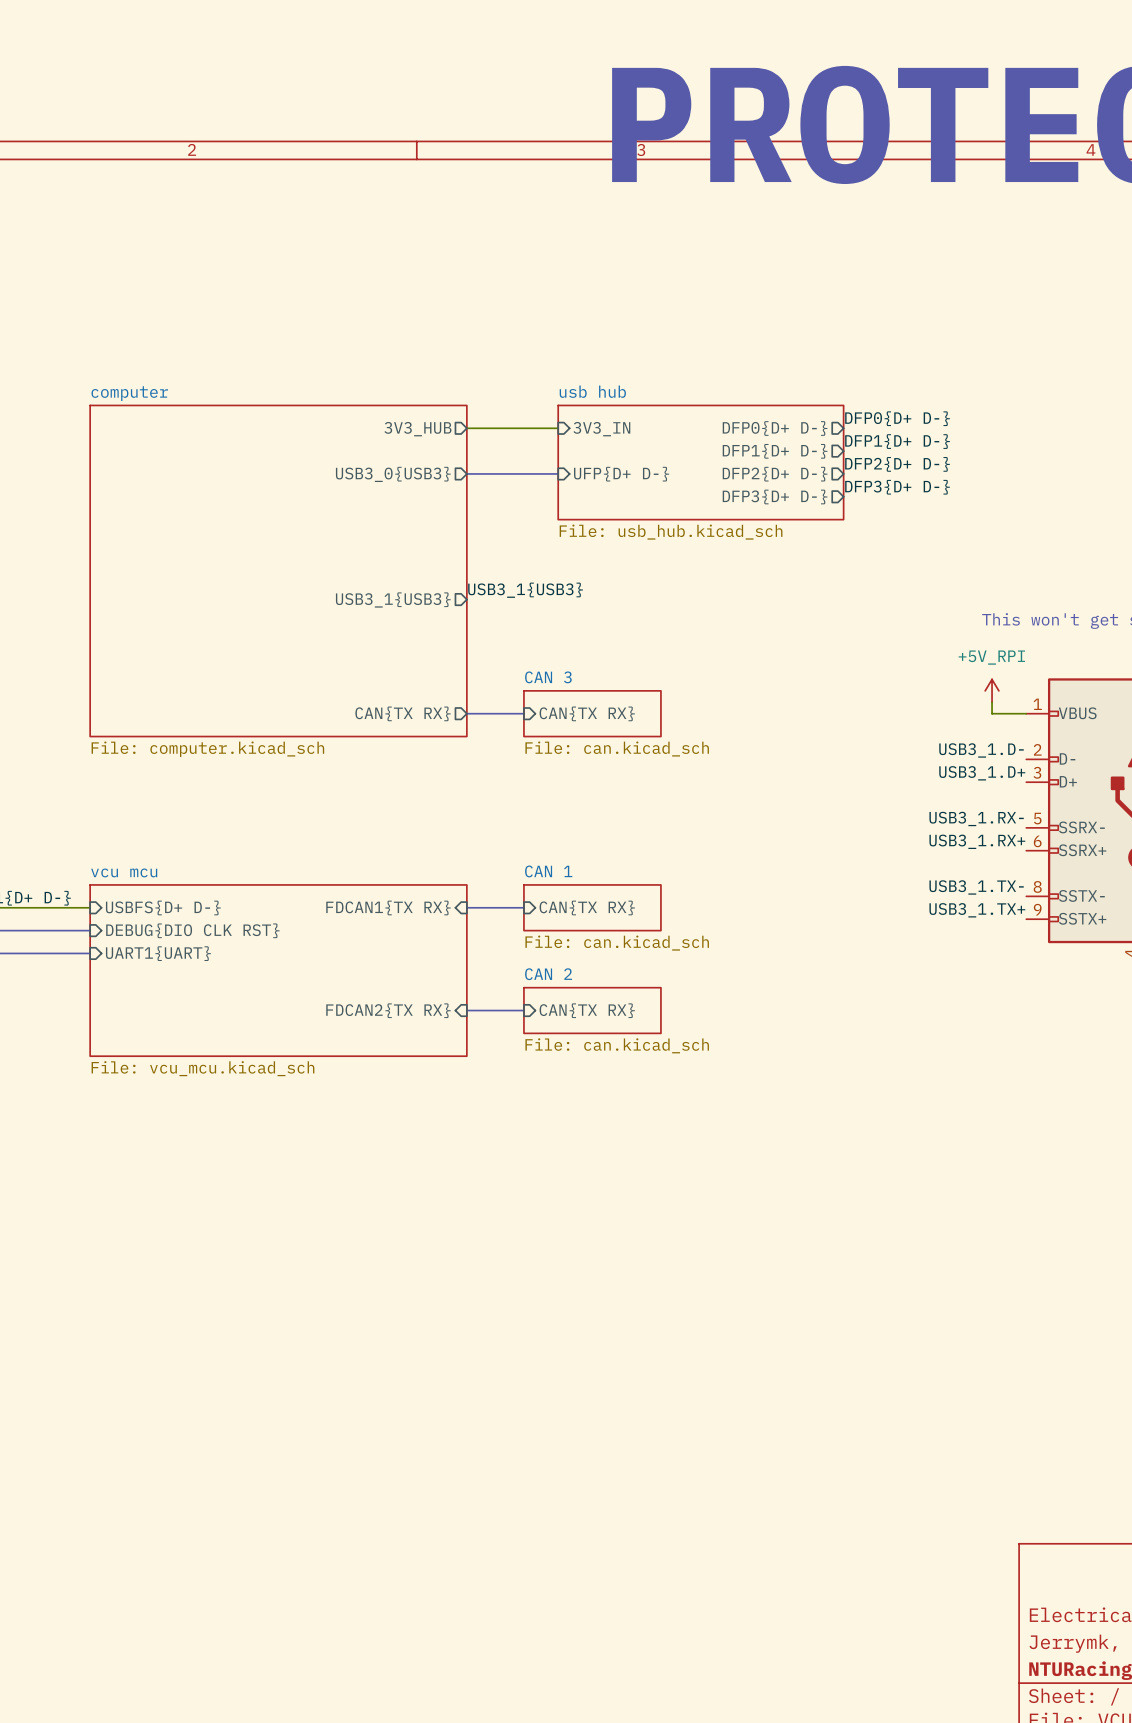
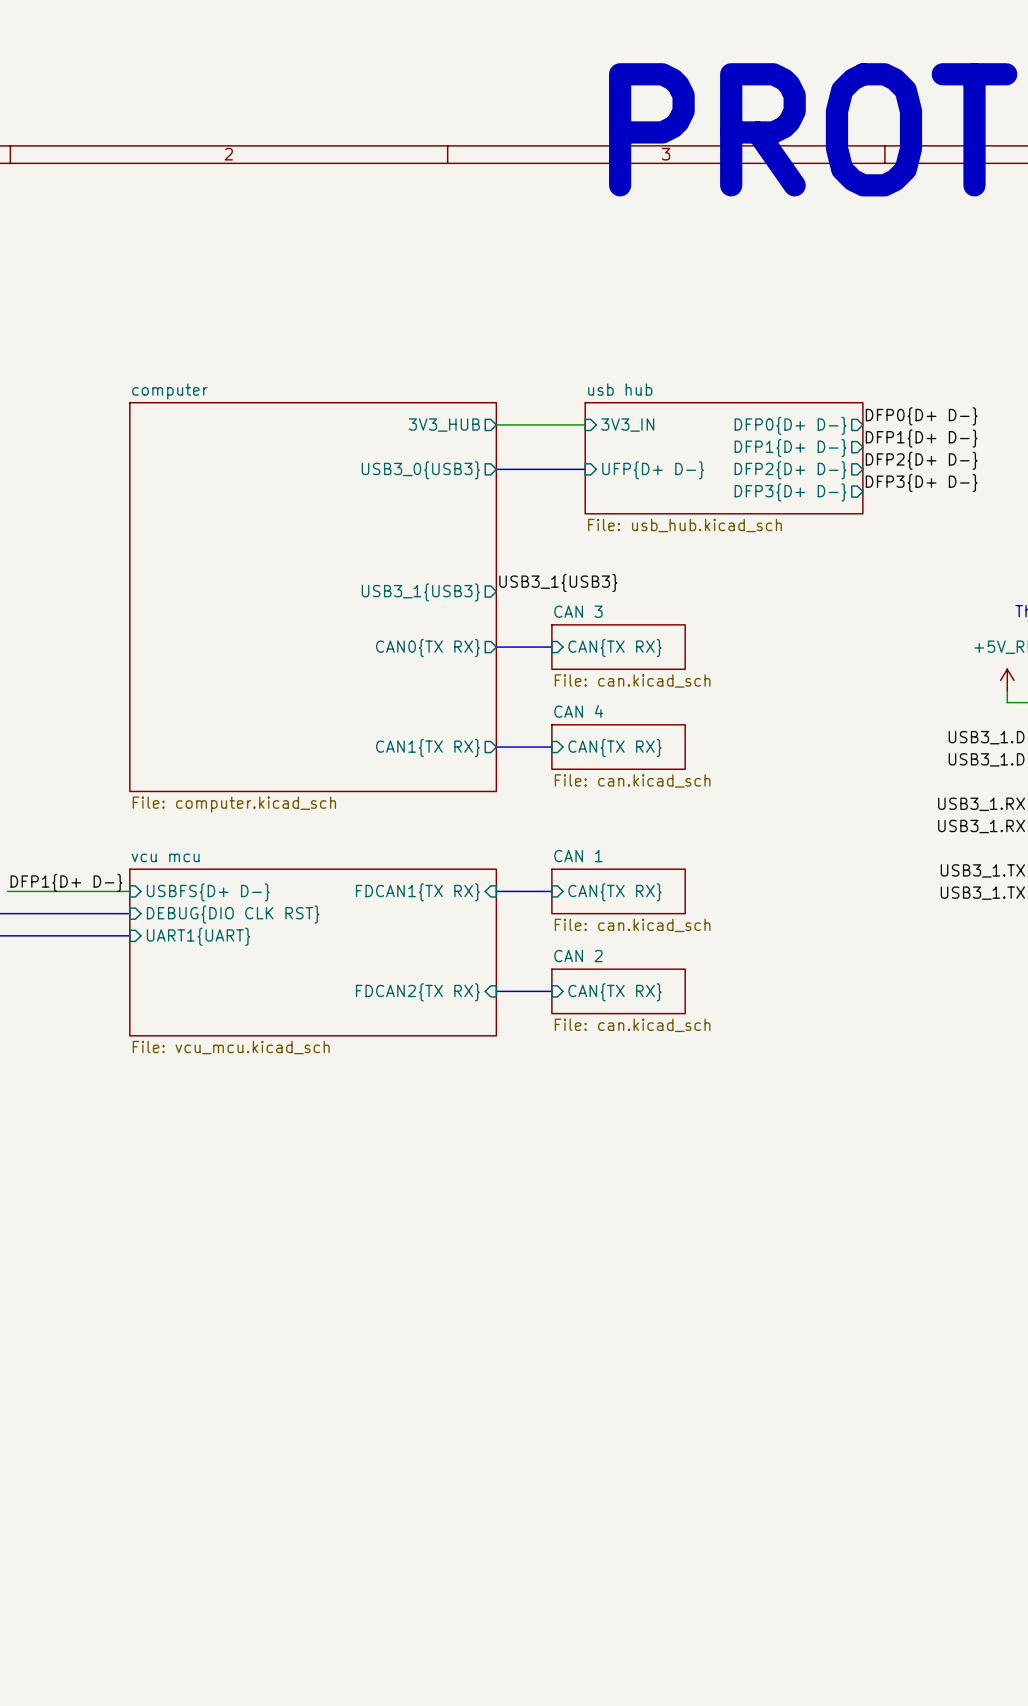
sheet computer: File: computer.kicad_sch (278, 571) -> none
sheet computer: none -> File: computer.kicad_sch (313, 597)
sheet pin: none -> CAN0{TX RX} (427, 647)
bus: none -> (496, 647) (551, 647)
sheet pin: none -> CAN{TX RX} (615, 647)
sheet pin: CAN{TX RX} (403, 713) -> none
bus: (466, 713) (523, 713) -> (496, 747) (551, 747)
sheet pin: CAN{TX RX} (587, 713) -> none
sheet CAN 3 position: (592, 713) -> (618, 647)
sheet pin: none -> CAN1{TX RX} (427, 747)
sheet pin: none -> CAN{TX RX} (615, 747)
sheet CAN 4: none -> File: can.kicad_sch (618, 747)

